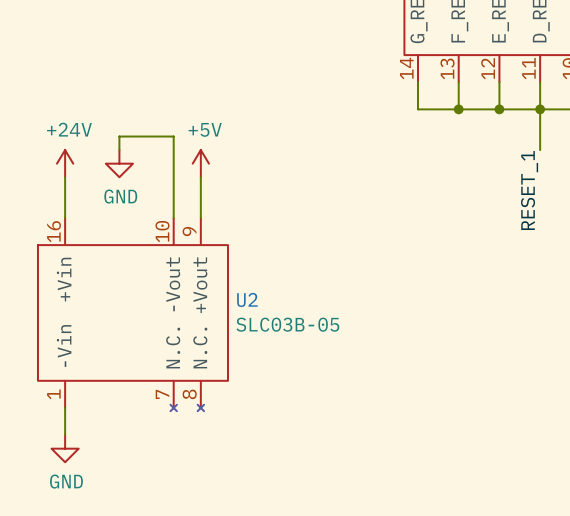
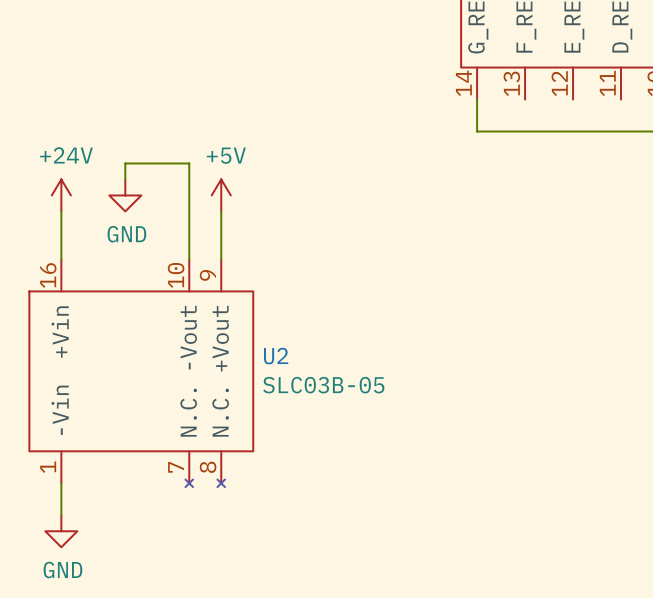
wire: (458, 82) (458, 109) -> none
wire: (499, 82) (499, 109) -> none
wire: (540, 82) (540, 150) -> none
junction: (458, 109) -> none
junction: (499, 109) -> none
junction: (540, 109) -> none
label: RESET_1 (529, 190) -> none

